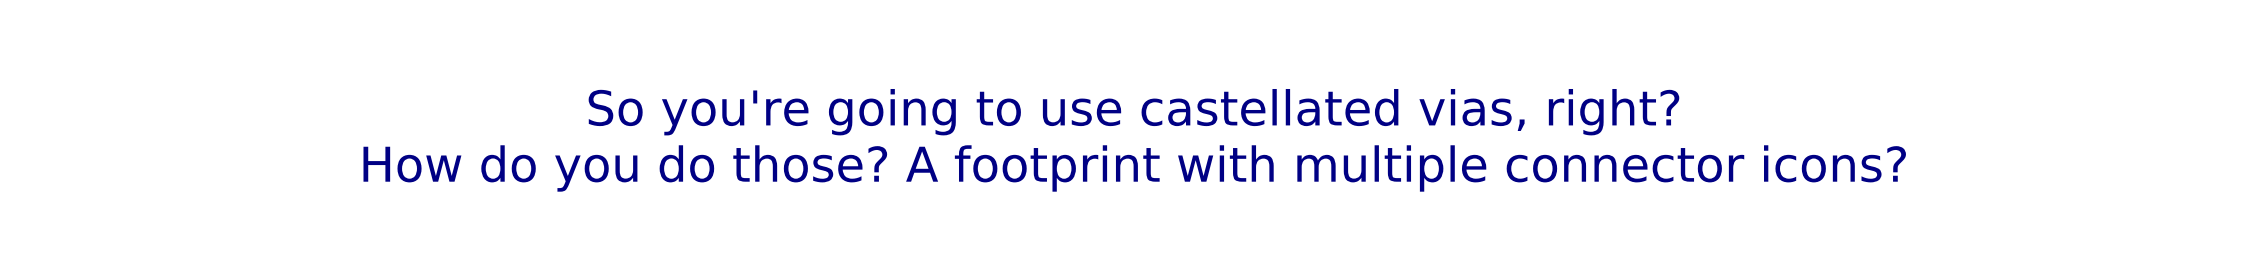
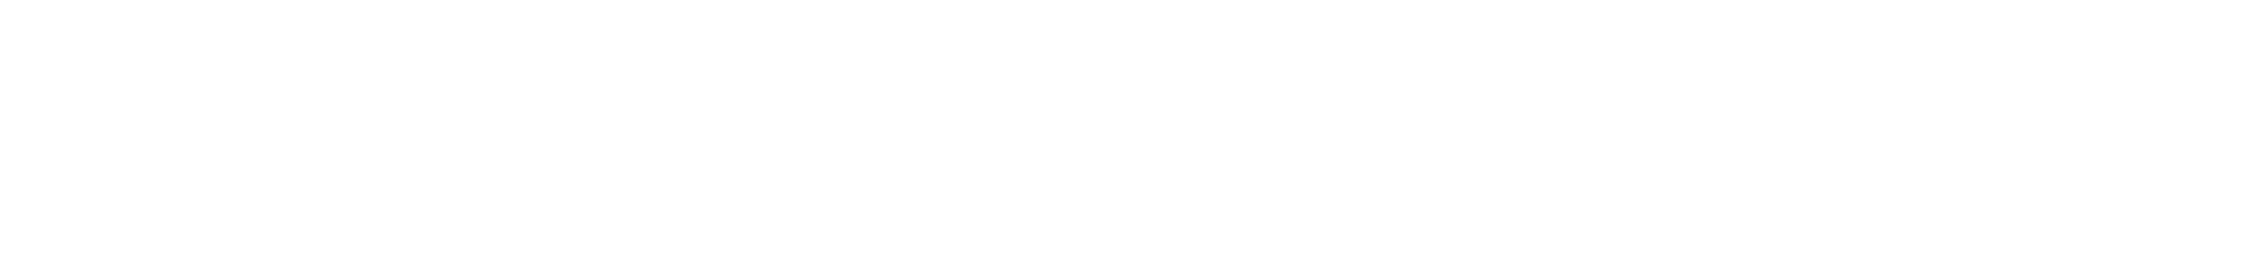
text: So you're going to use castellated vias, right? (1133, 112) -> none
text: How do you do those? A footprint with multiple connector icons? (1134, 168) -> none

